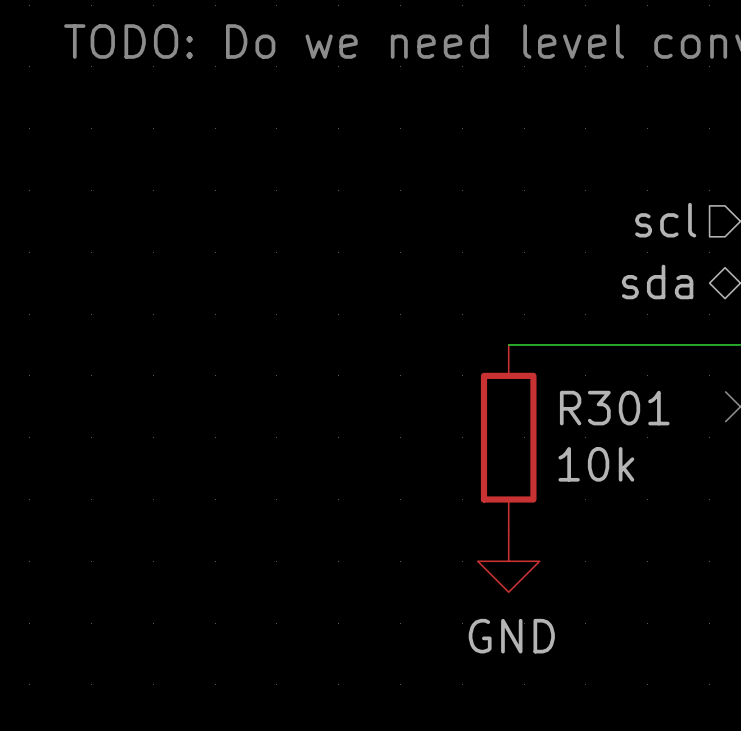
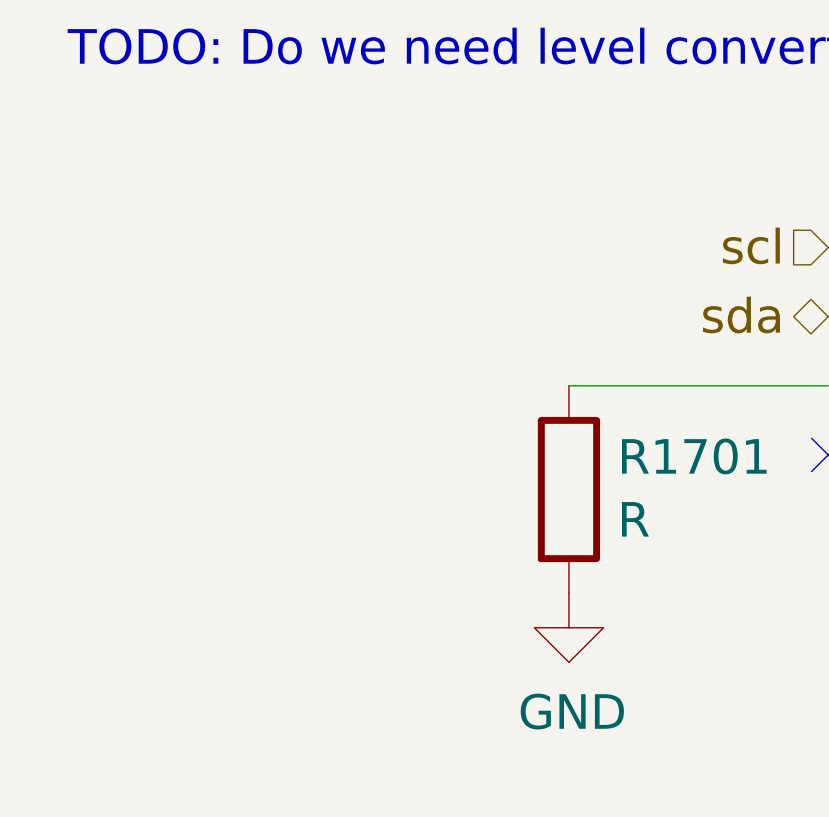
R301 name: R301 (614, 408) -> R1701 (694, 456)
R301 value: 10k (596, 464) -> R (635, 519)

